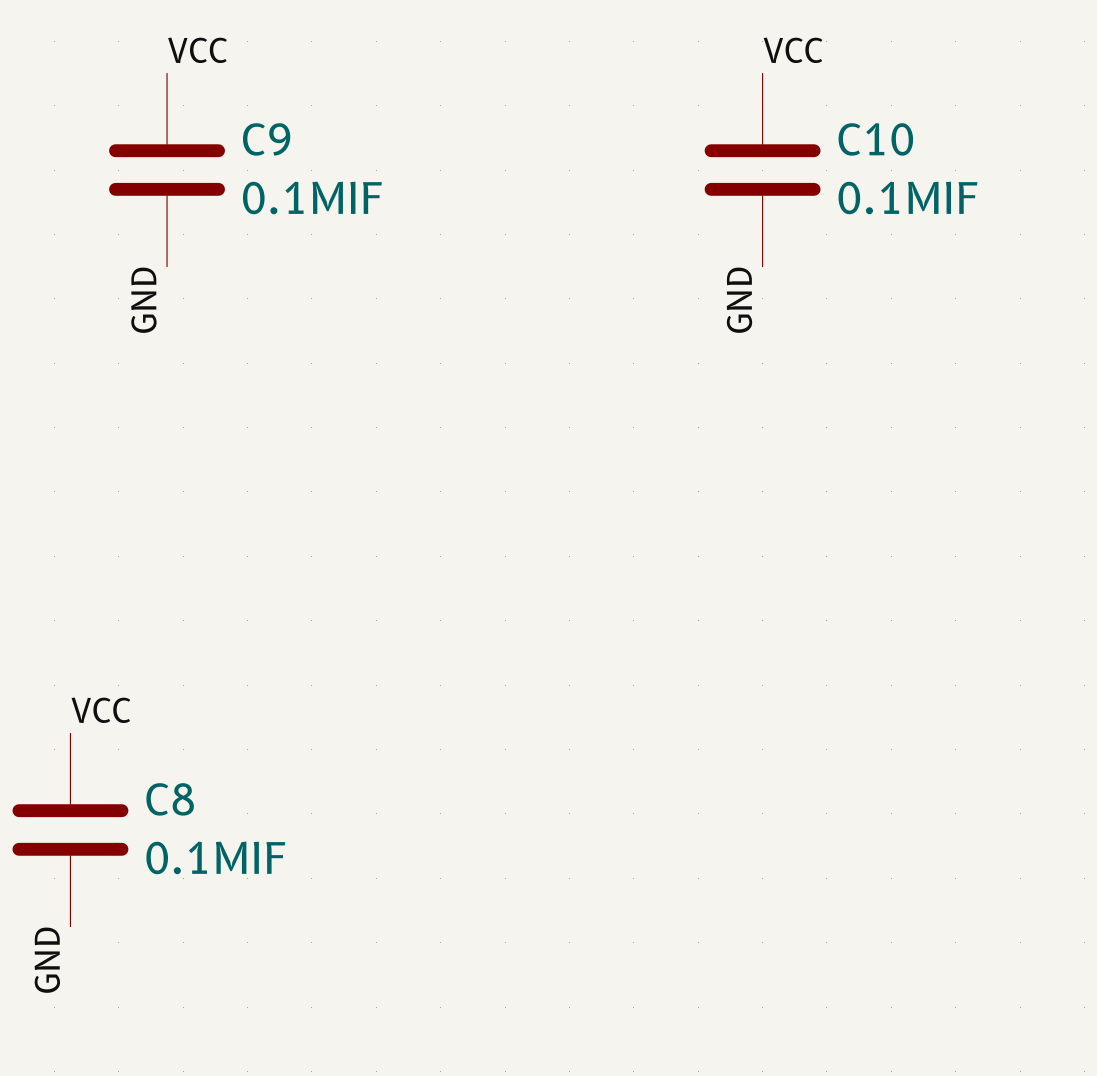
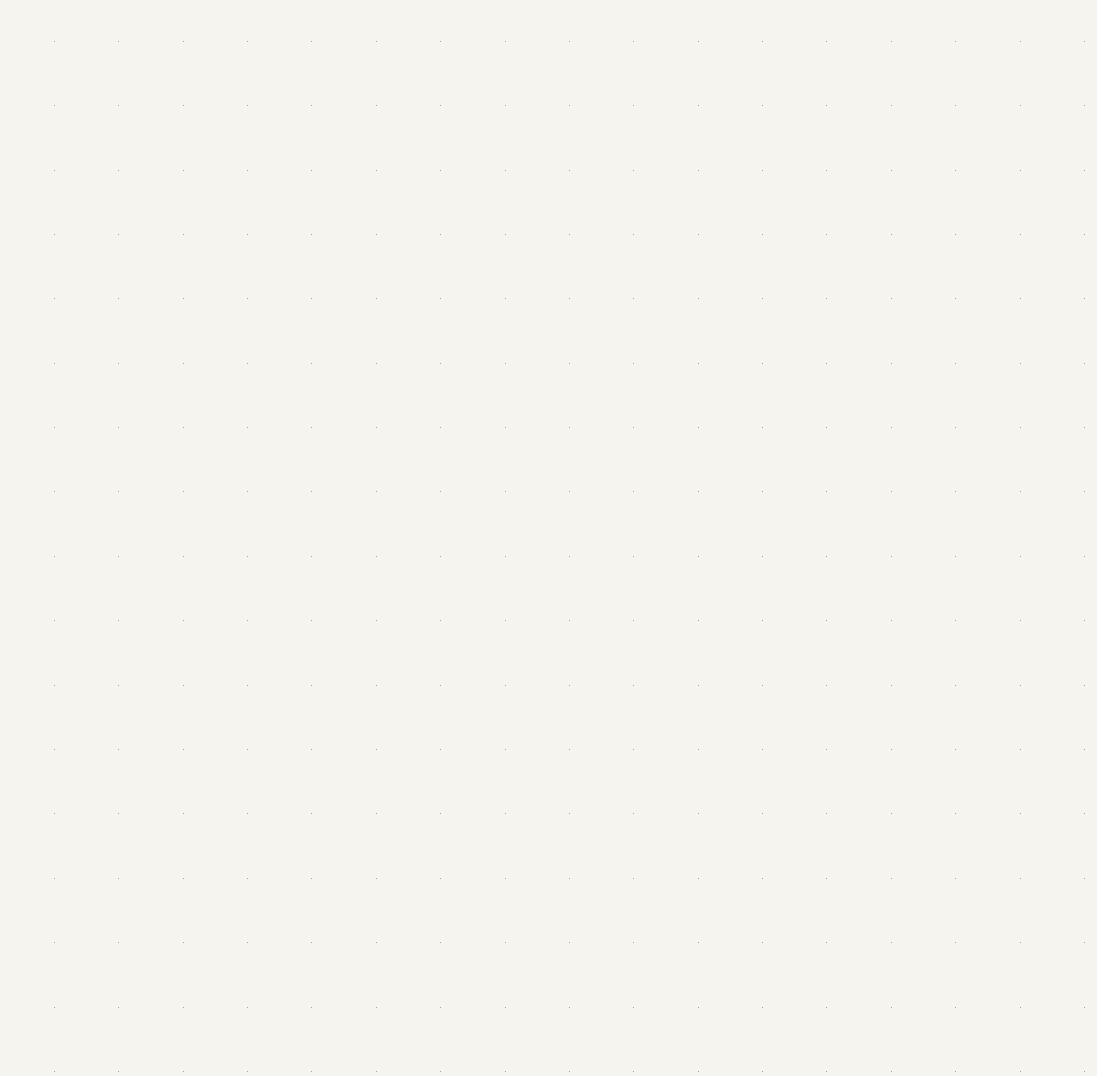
label: VCC (197, 50) -> none
label: VCC (793, 50) -> none
C9: 0.1MIF (167, 170) -> none
C10: 0.1MIF (762, 170) -> none
label: GND (143, 300) -> none
label: GND (739, 300) -> none
label: VCC (100, 710) -> none
C8: 0.1MIF (70, 829) -> none
label: GND (47, 960) -> none

